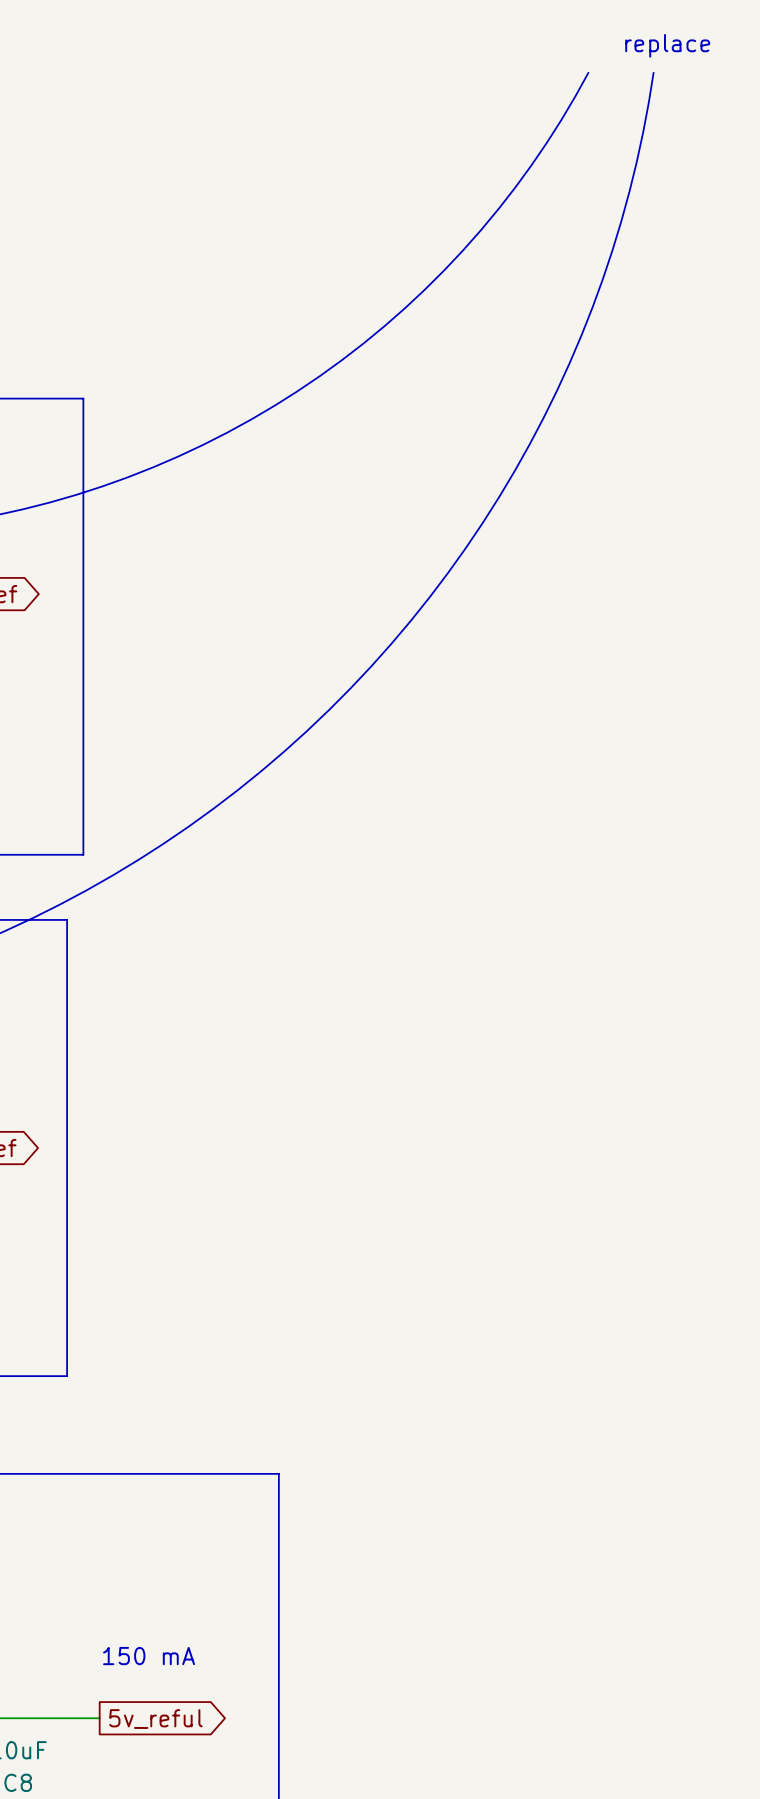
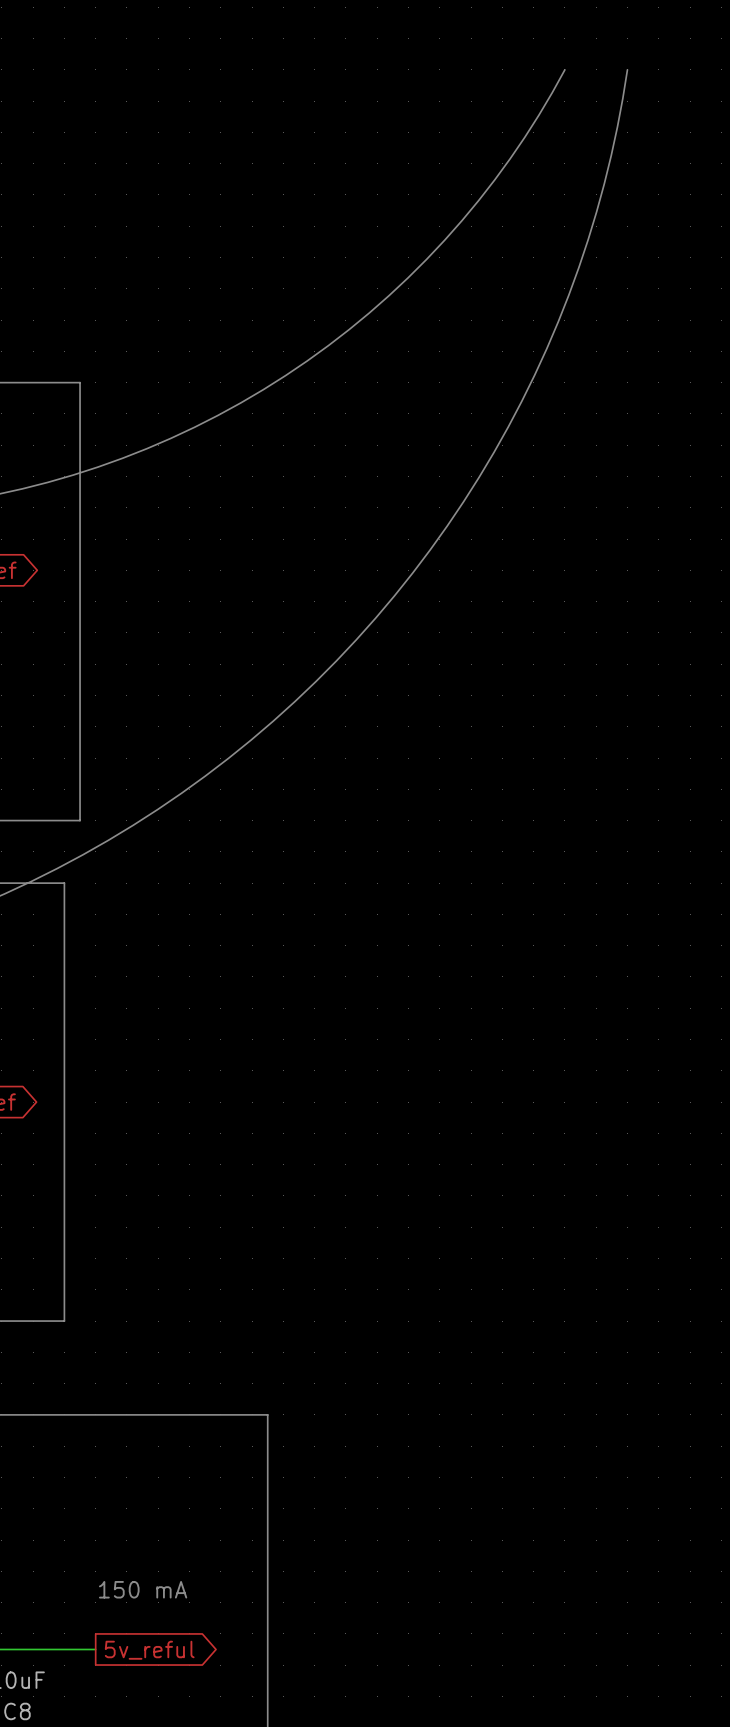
text: replace (667, 45) -> none

